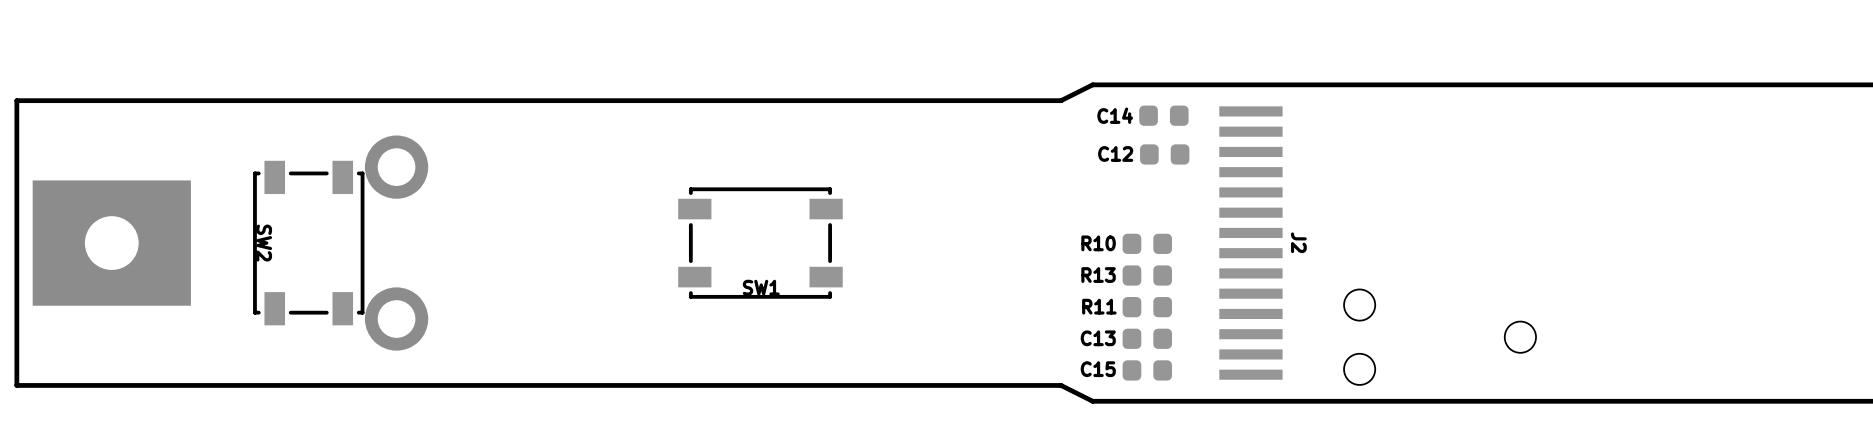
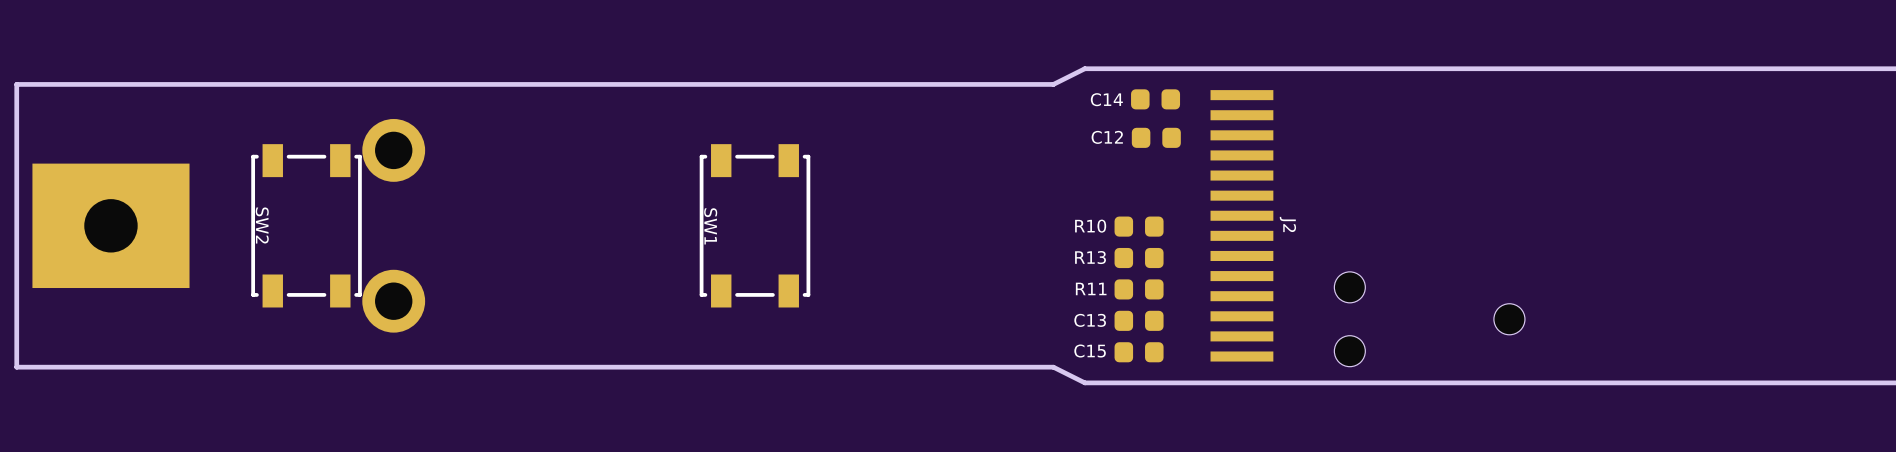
SW1 rotation: 0° (760, 243) -> 90° clockwise (754, 225)

